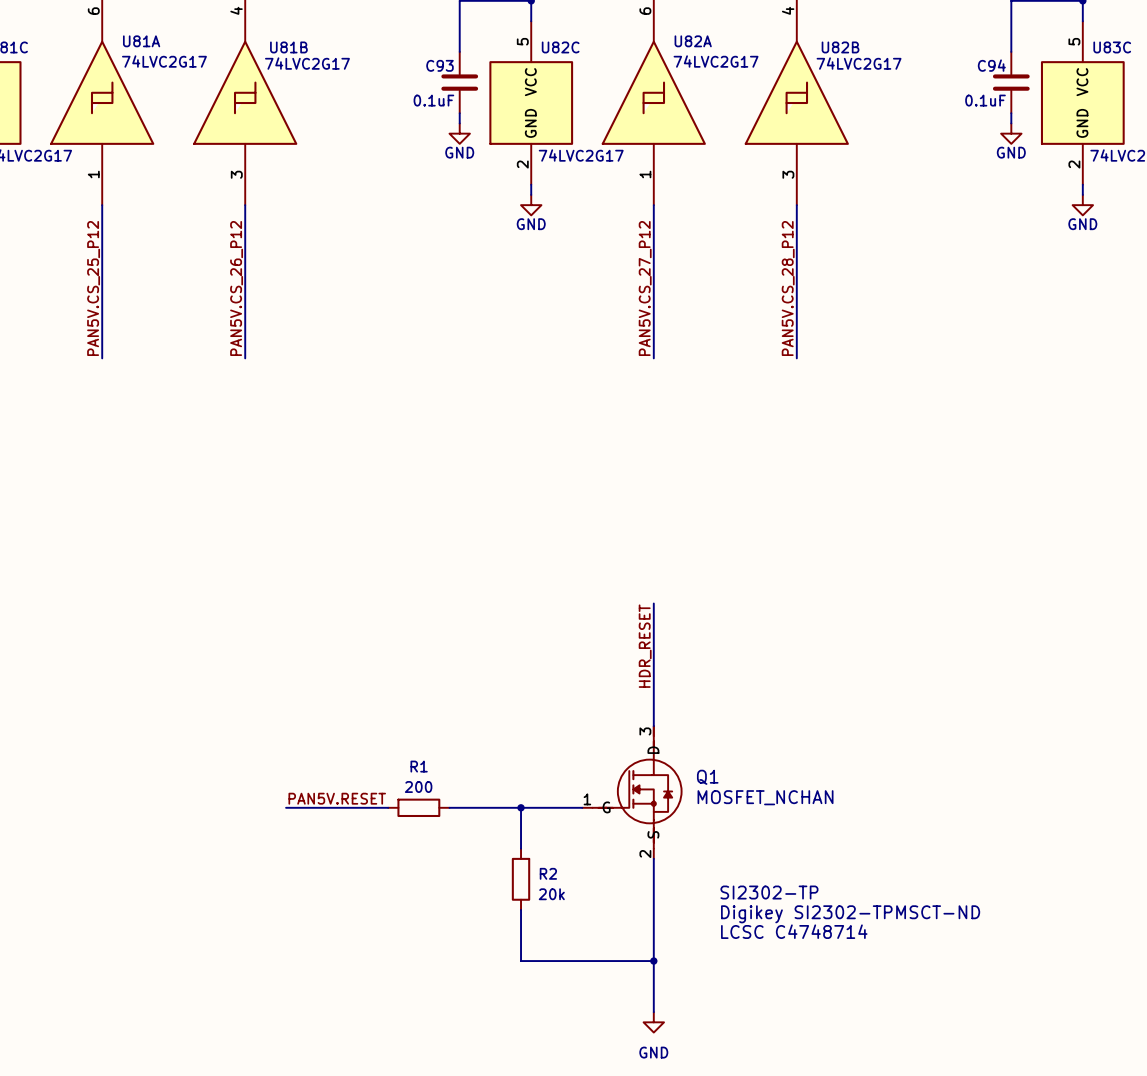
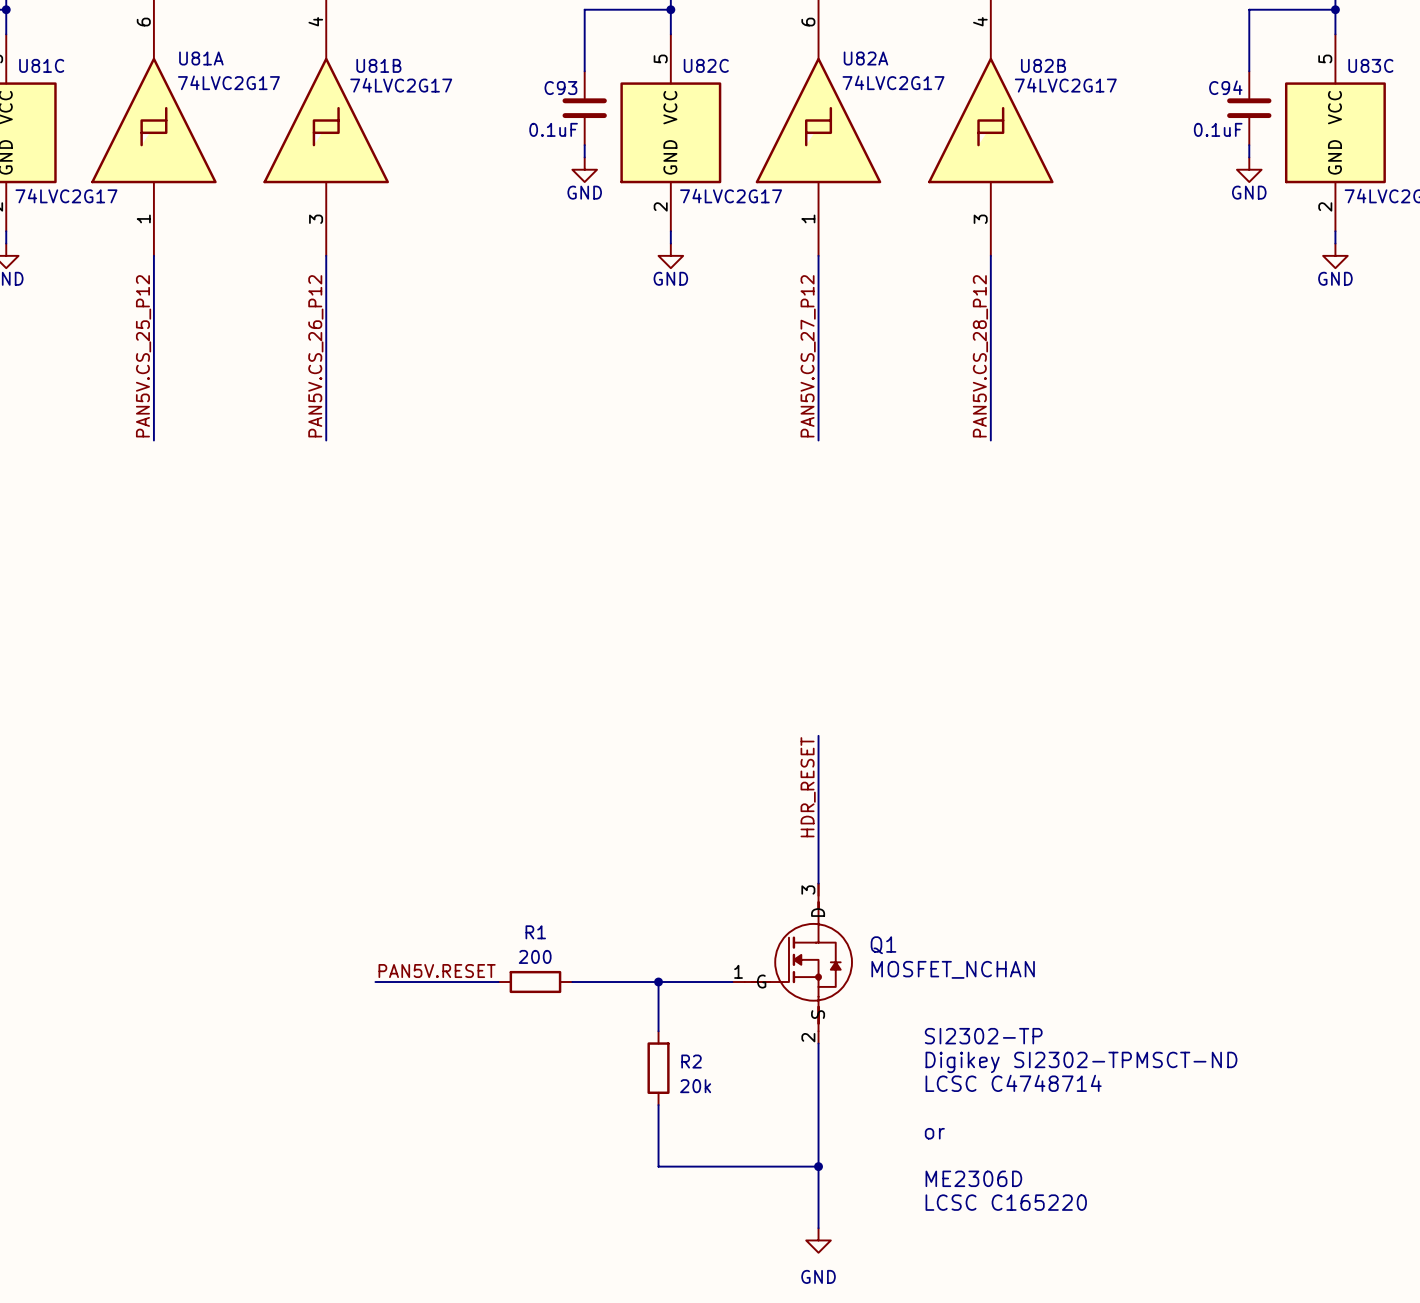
text position: SI2302-TP (769, 892) -> SI2302-TP (983, 1036)
text position: Digikey SI2302-TPMSCT-ND (850, 914) -> Digikey SI2302-TPMSCT-ND (1081, 1062)
text position: LCSC C4748714 (794, 931) -> LCSC C4748714 (1013, 1083)
text: none -> or (934, 1133)
text: none -> ME2306D (973, 1178)
text: none -> LCSC C165220 (1006, 1202)

